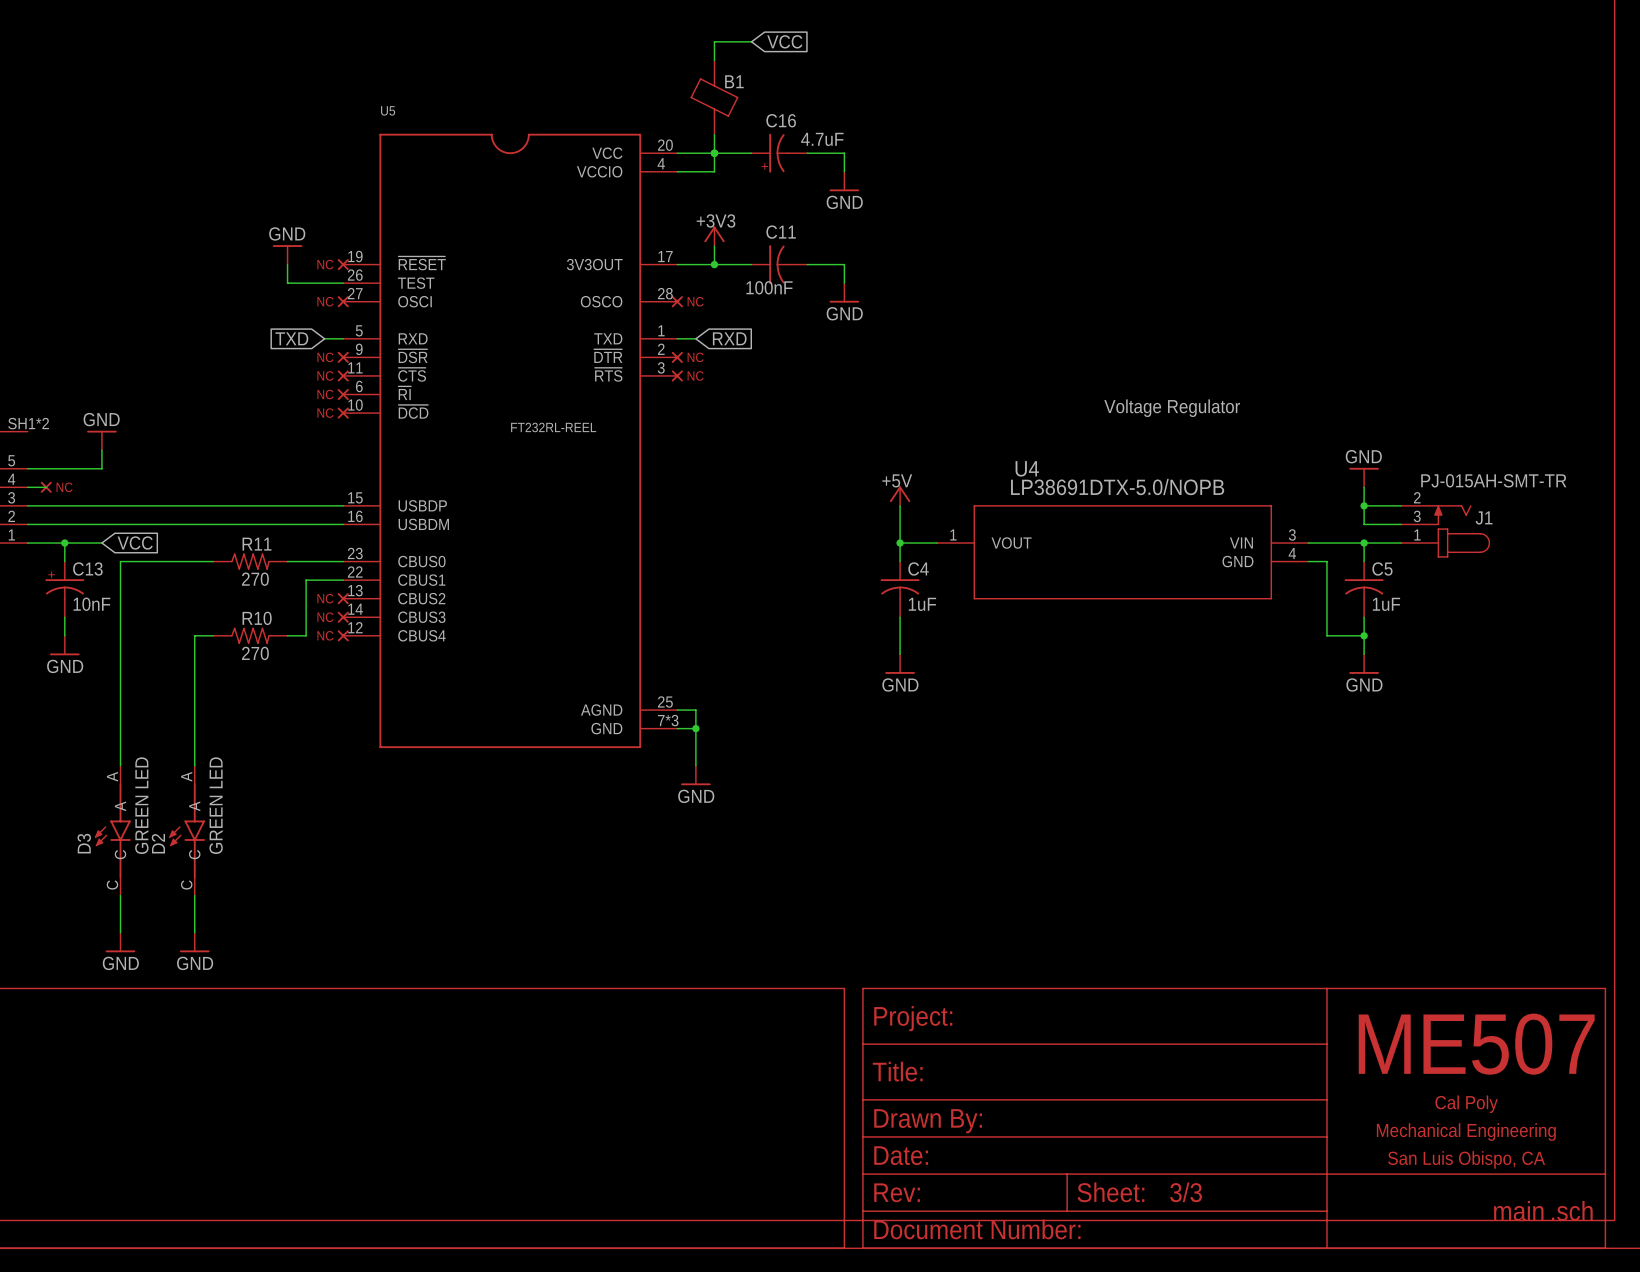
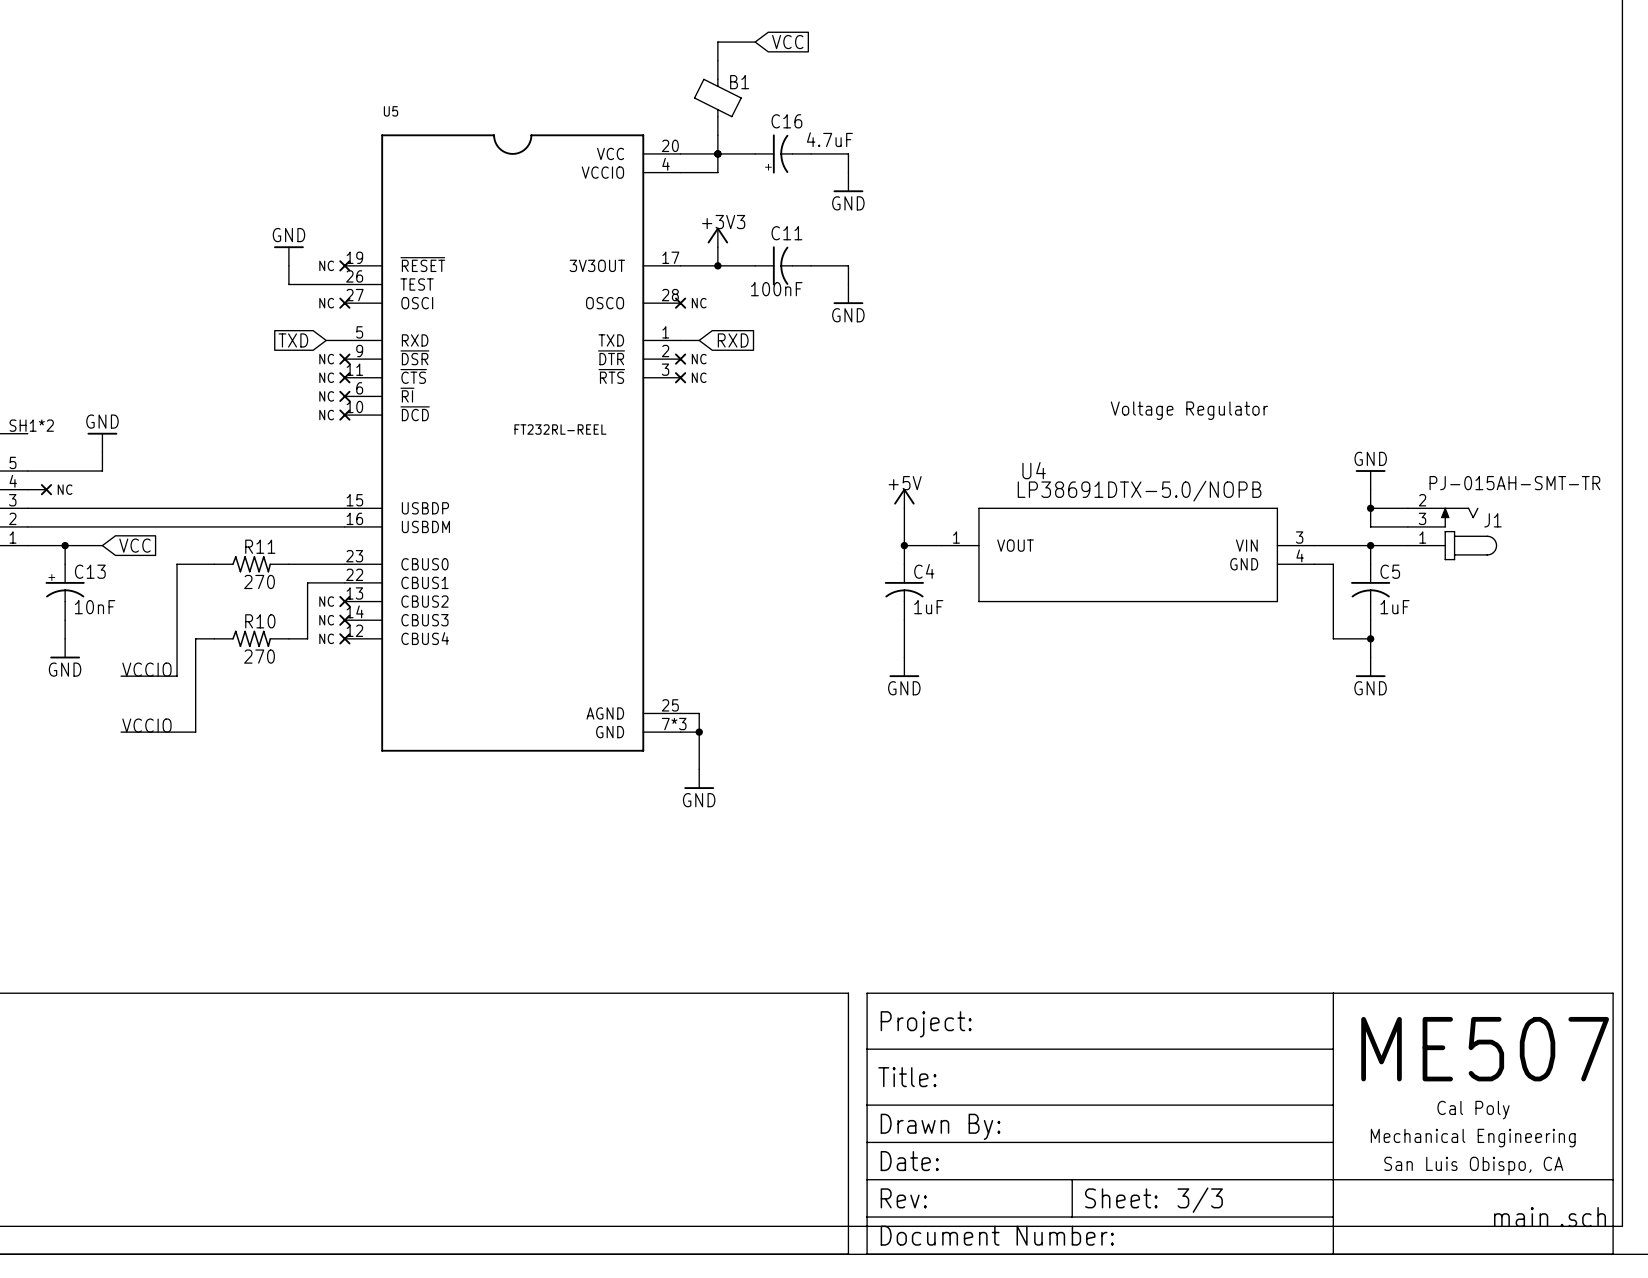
wire: (176, 561) (120, 561) (120, 765) -> (177, 564) (177, 676) (121, 676)
label: none -> VCCIO (146, 669)
label: none -> VCCIO (146, 725)
wire: (194, 728) (194, 765) -> (195, 732) (121, 732)
D3: GREEN LED (112, 830) -> none
D2: GREEN LED (187, 830) -> none
wire: (120, 895) (120, 932) -> none
wire: (194, 895) (194, 932) -> none
power symbol: GND (120, 942) -> none
power symbol: GND (194, 942) -> none

